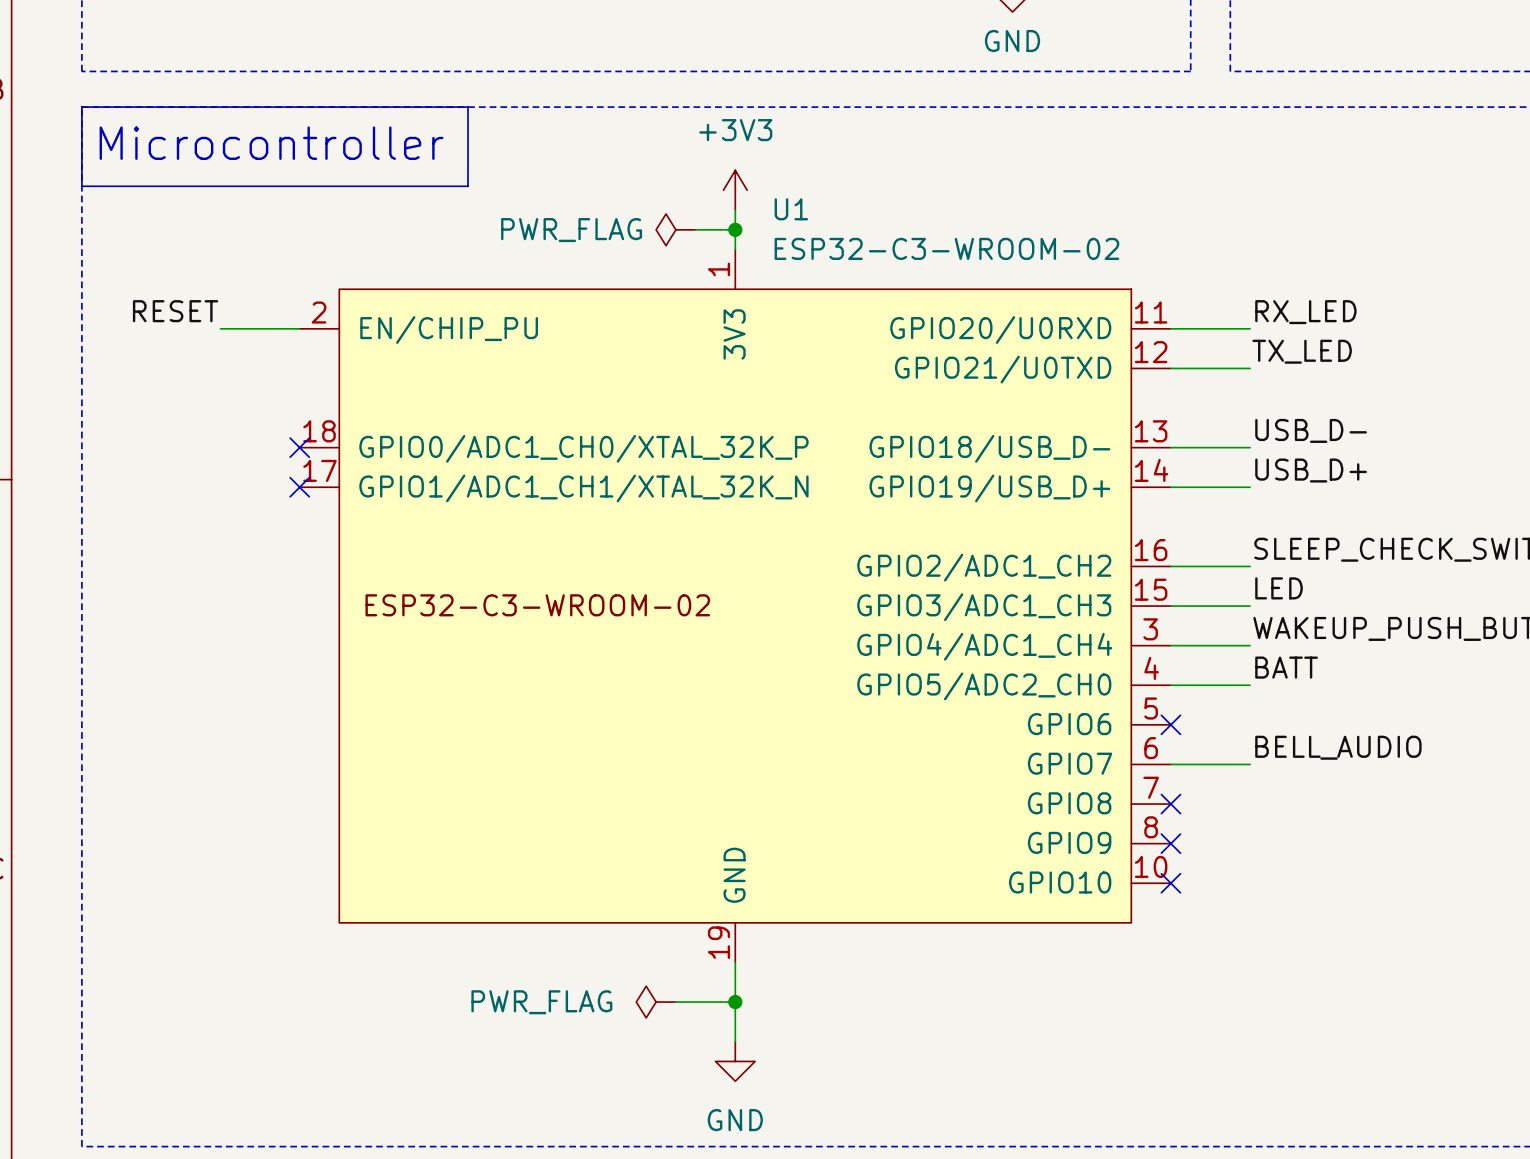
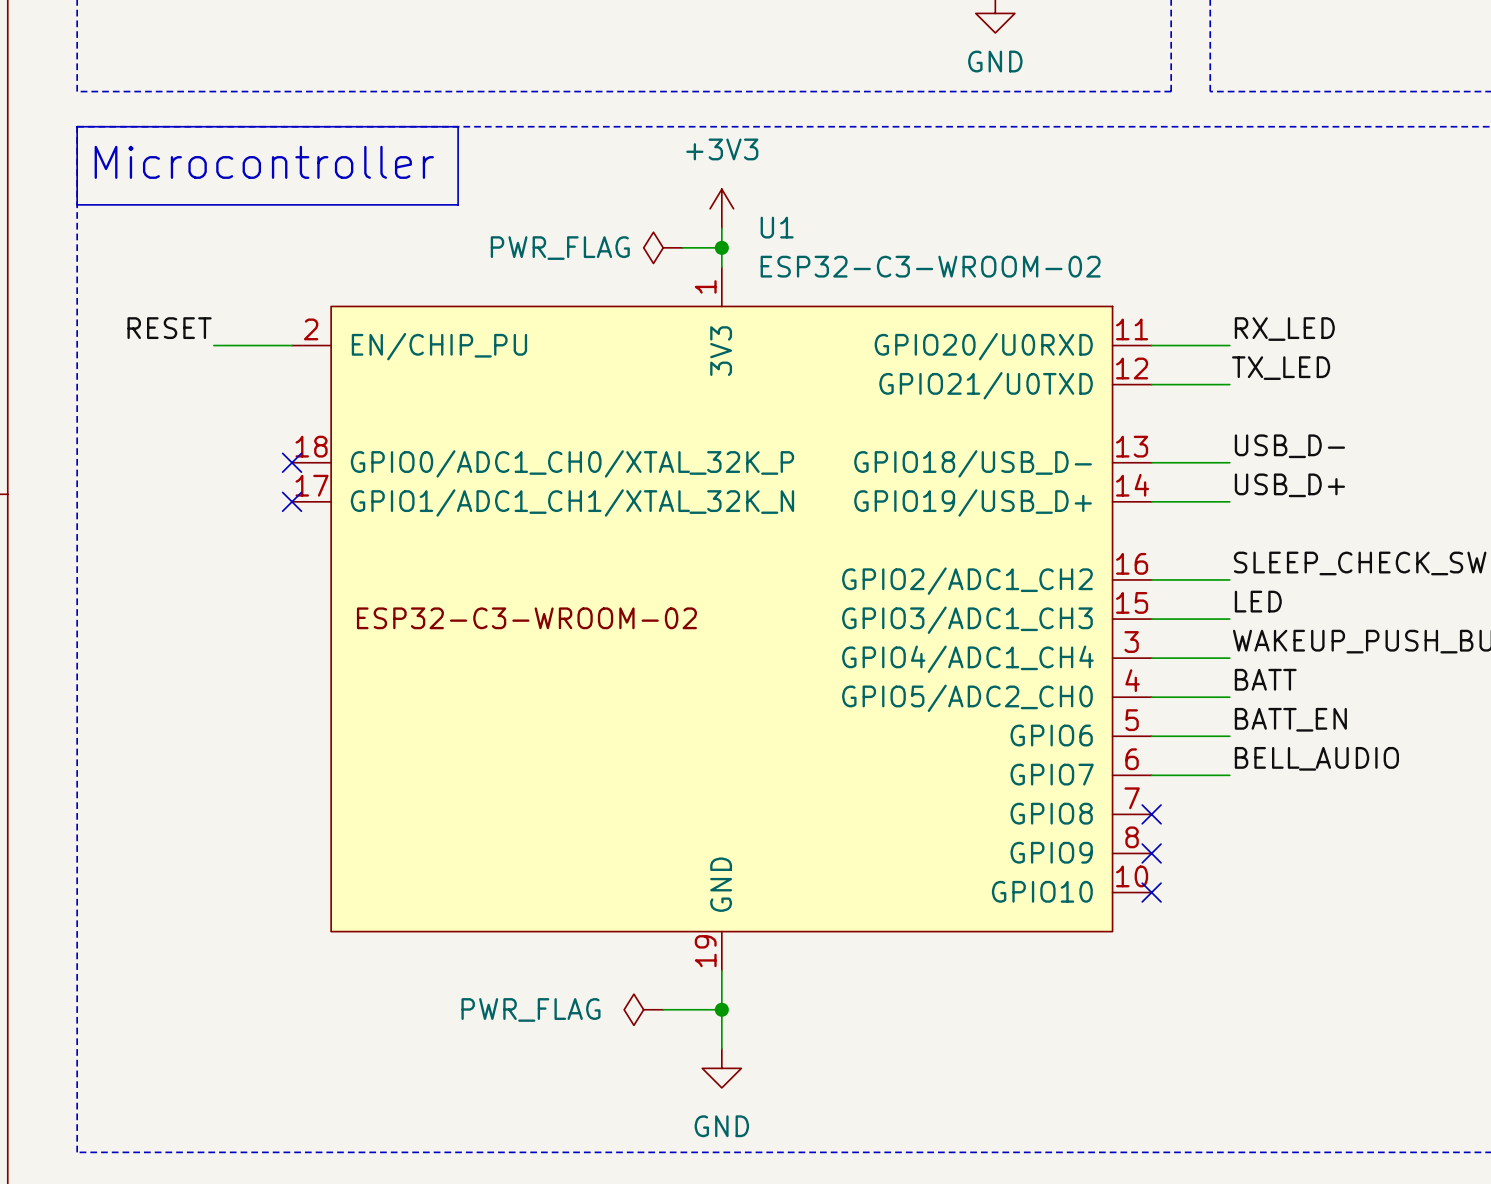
label: none -> BATT_EN (1290, 719)
wire: none -> (1151, 736) (1229, 736)
no-connect mark: (1170, 724) -> none

